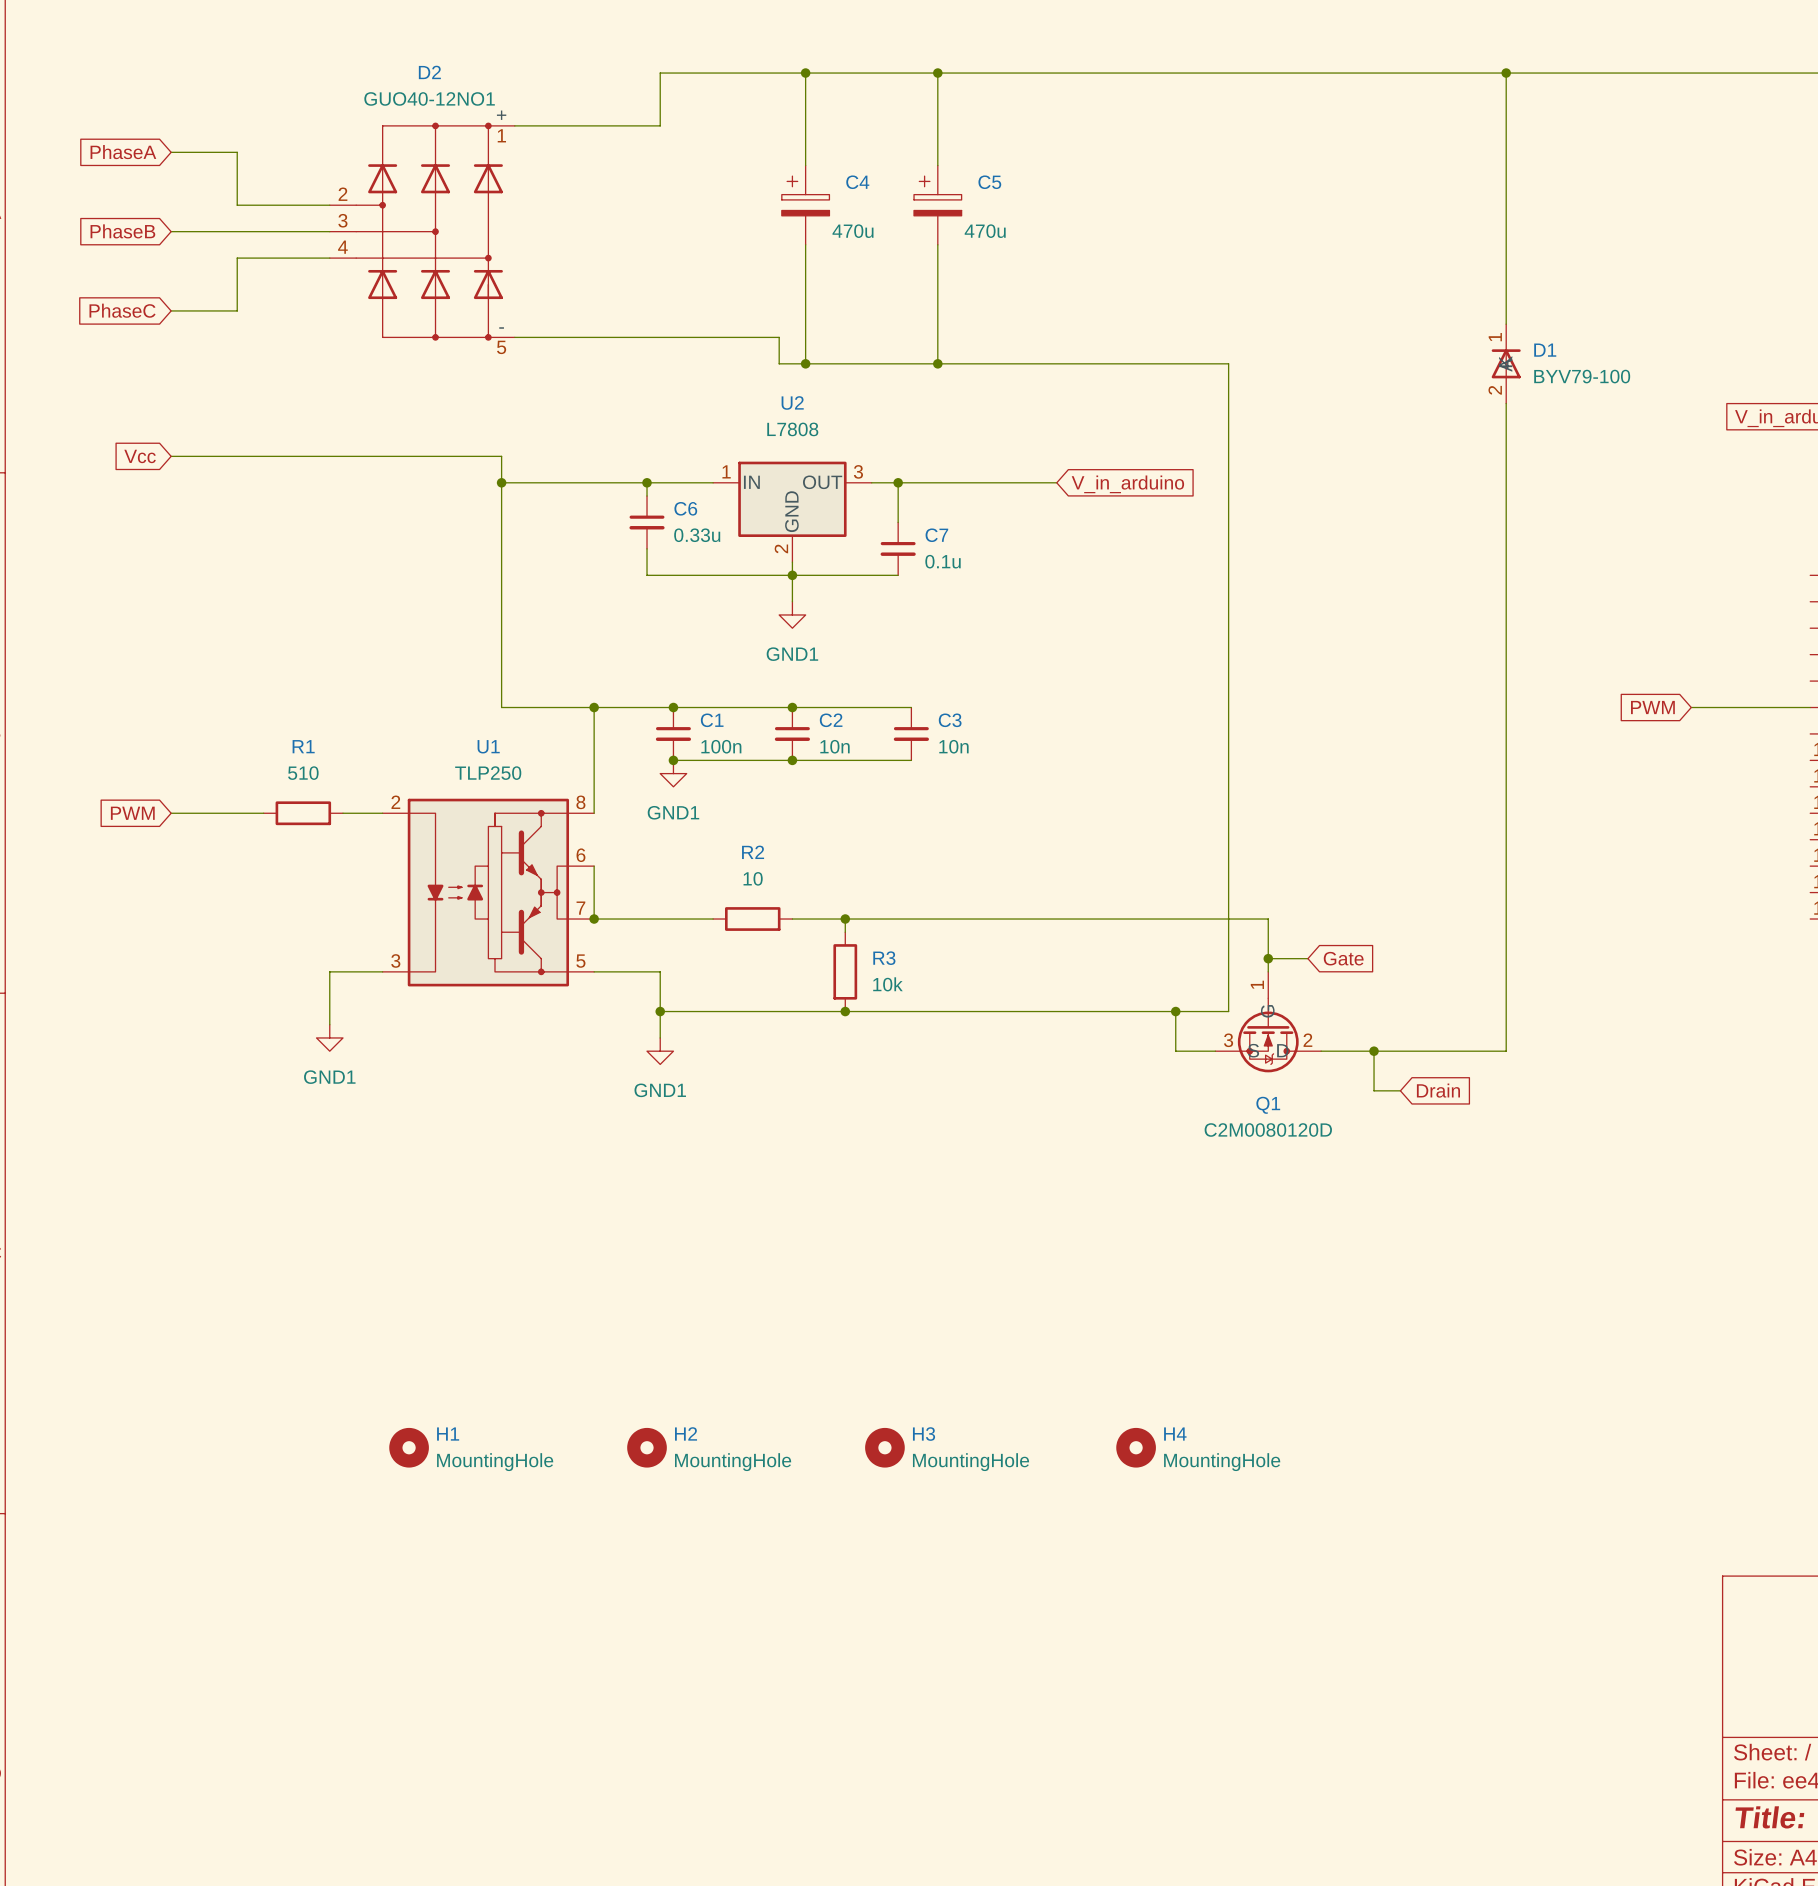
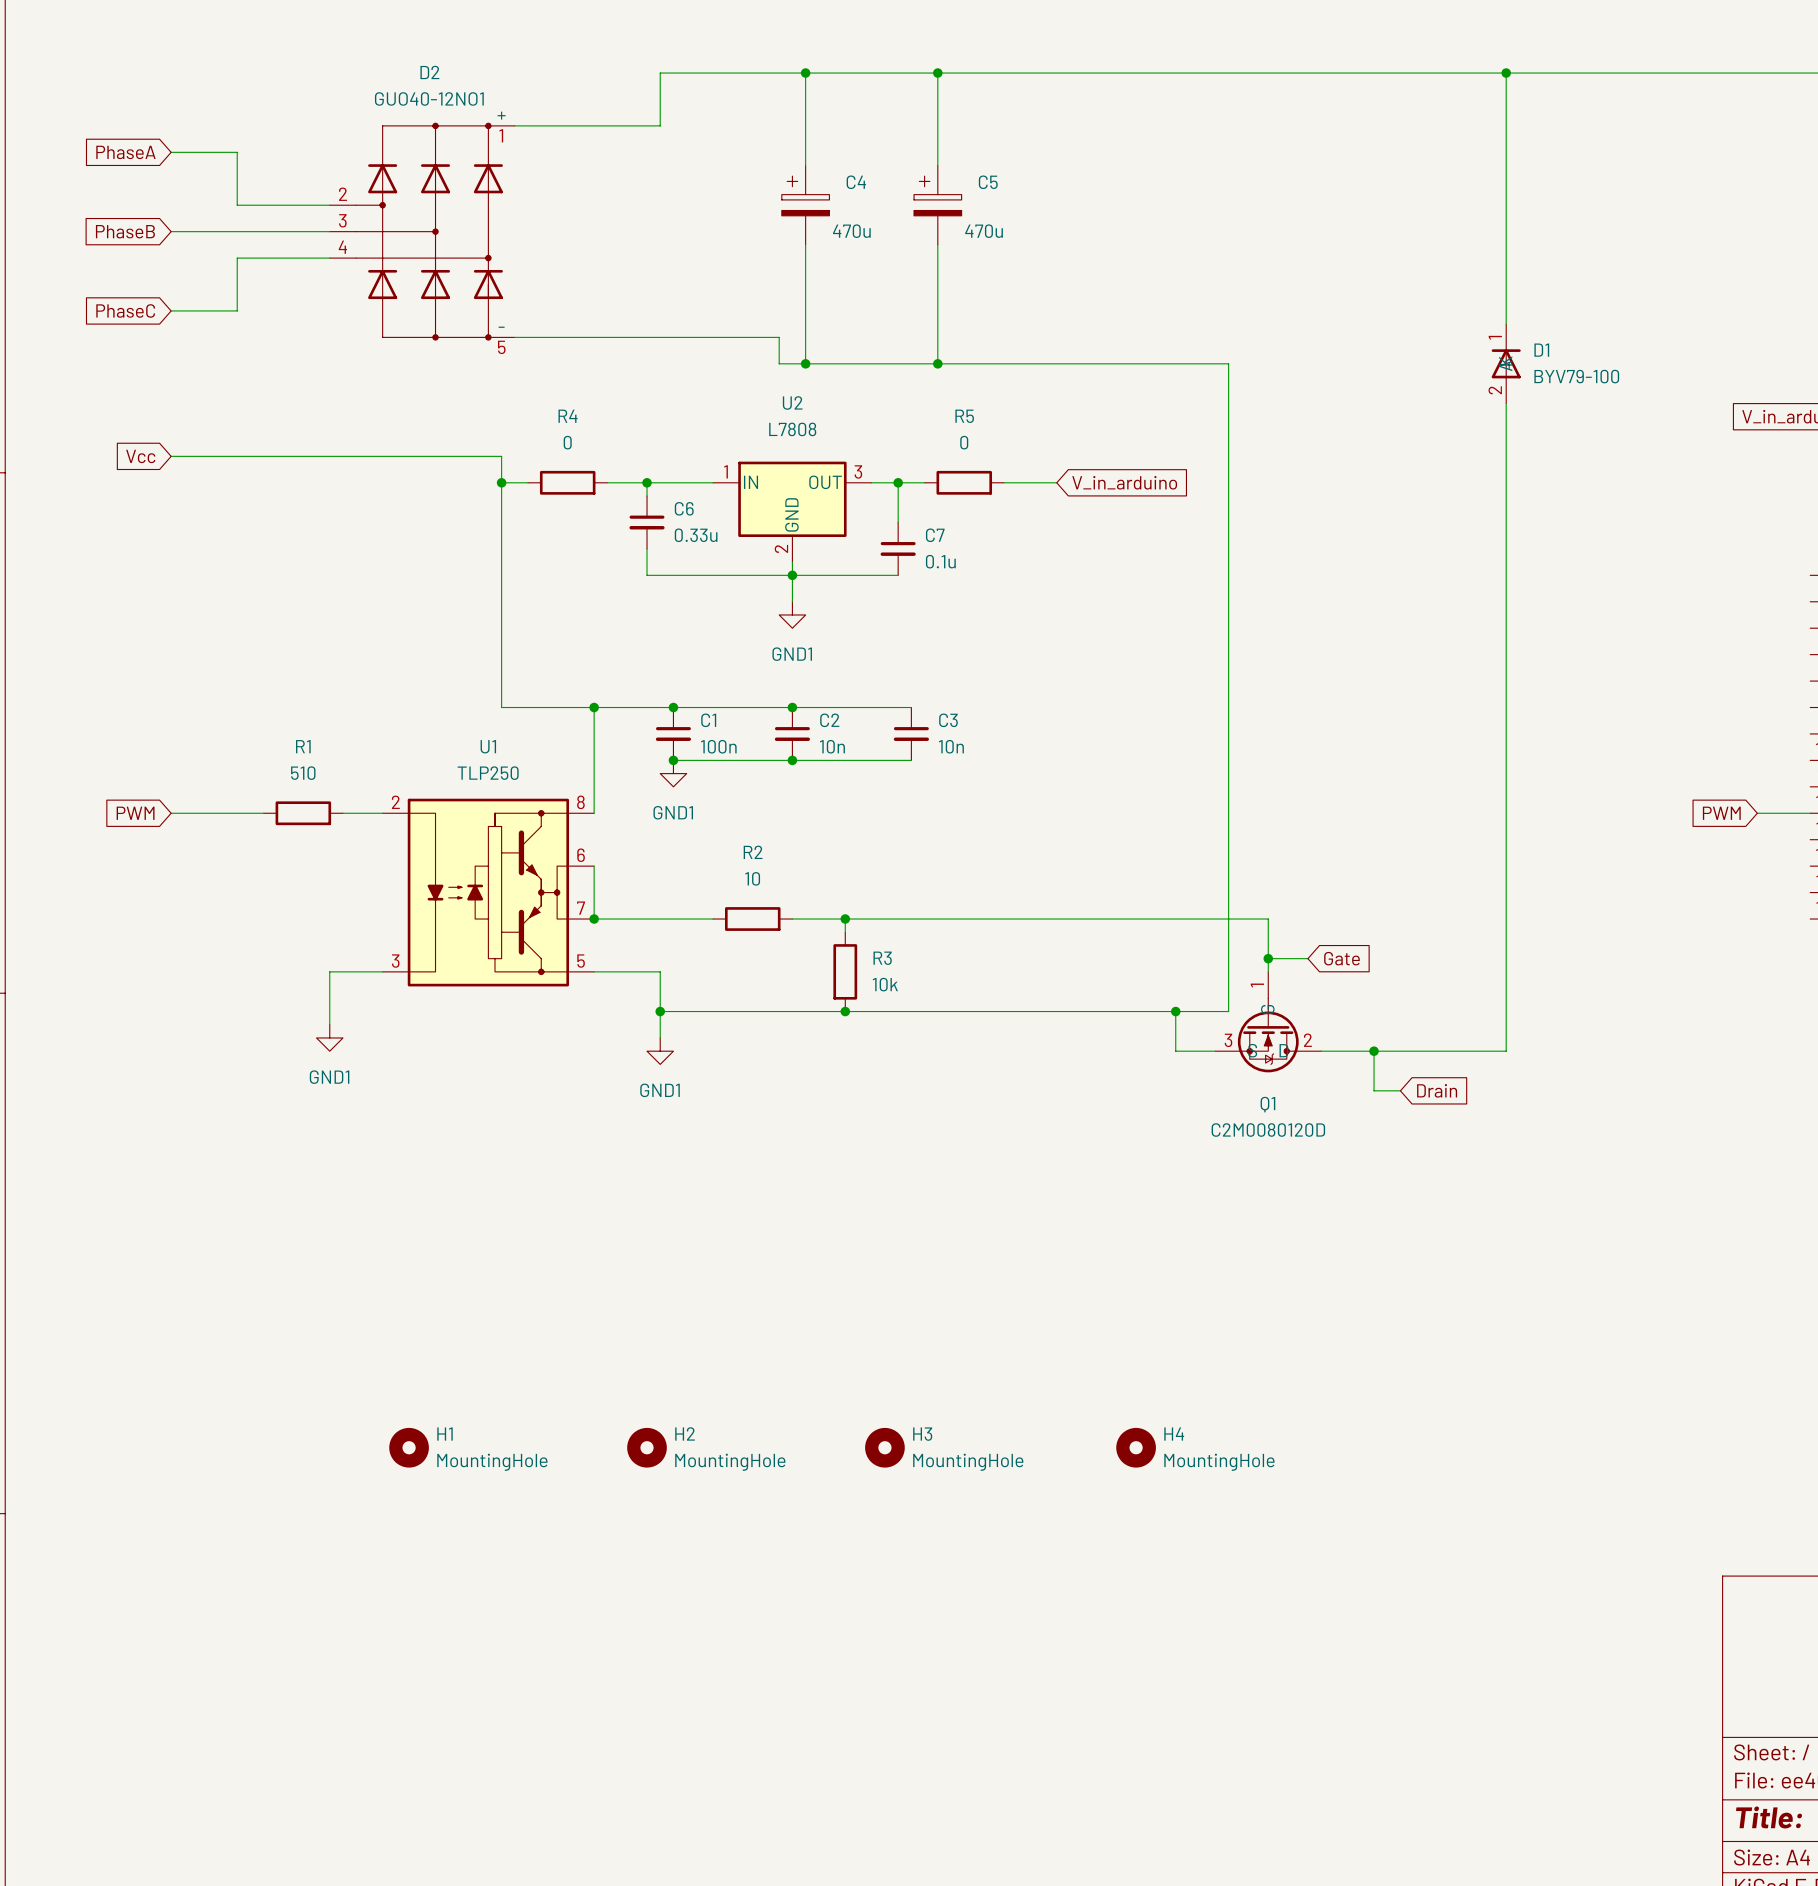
wire: (528, 482) (607, 482) -> none
R4: none -> 0 (567, 482)
wire: (924, 482) (1003, 482) -> none
R5: none -> 0 (964, 482)
global label position: PWM (1652, 707) -> PWM (1721, 813)
wire: (1691, 707) (1810, 707) -> none
wire: none -> (1757, 813) (1810, 813)

